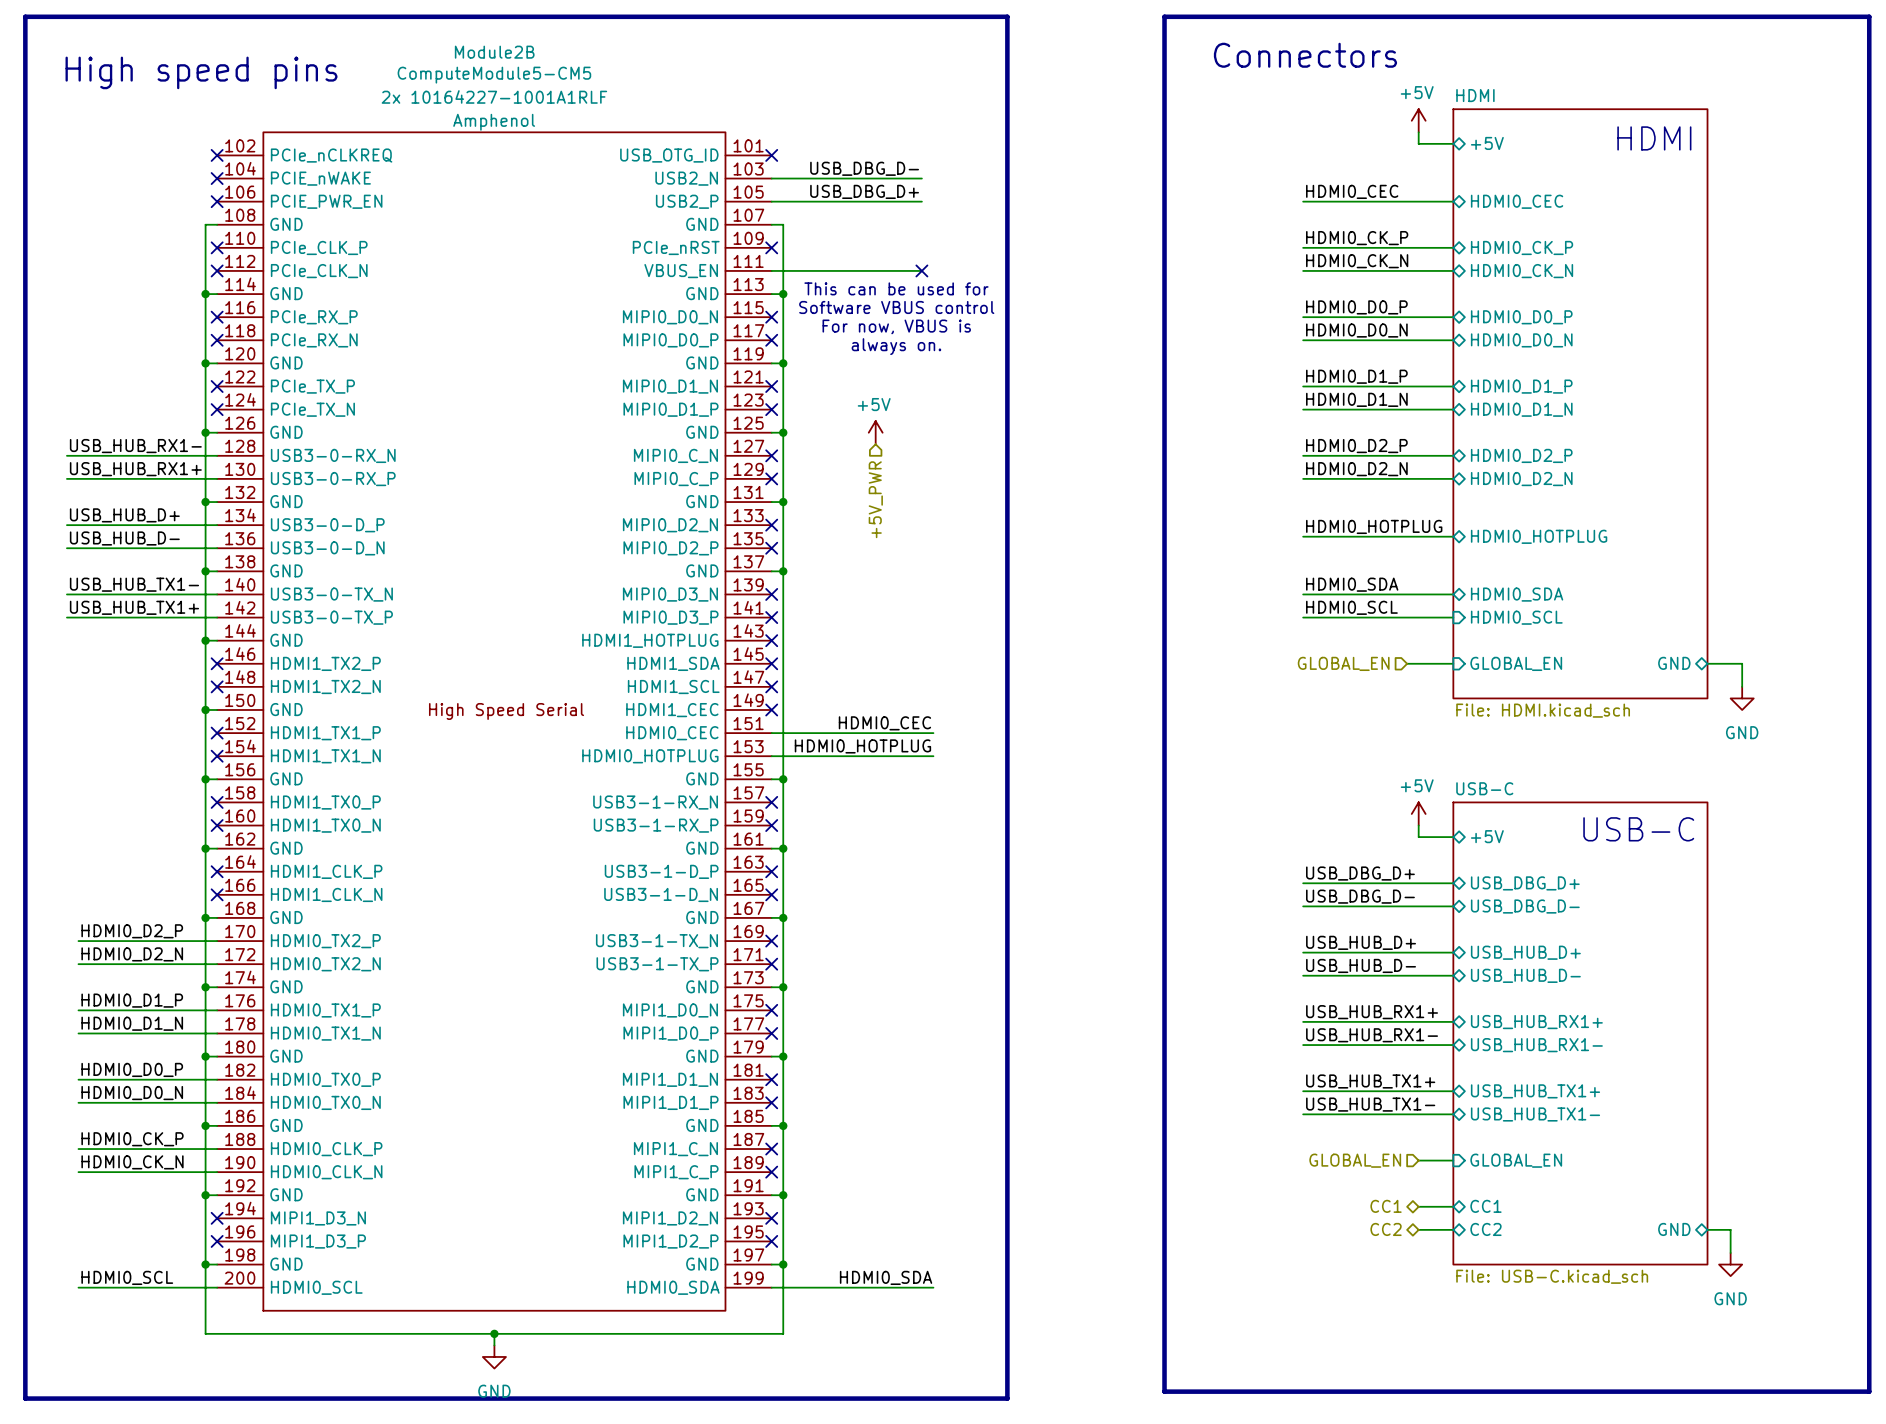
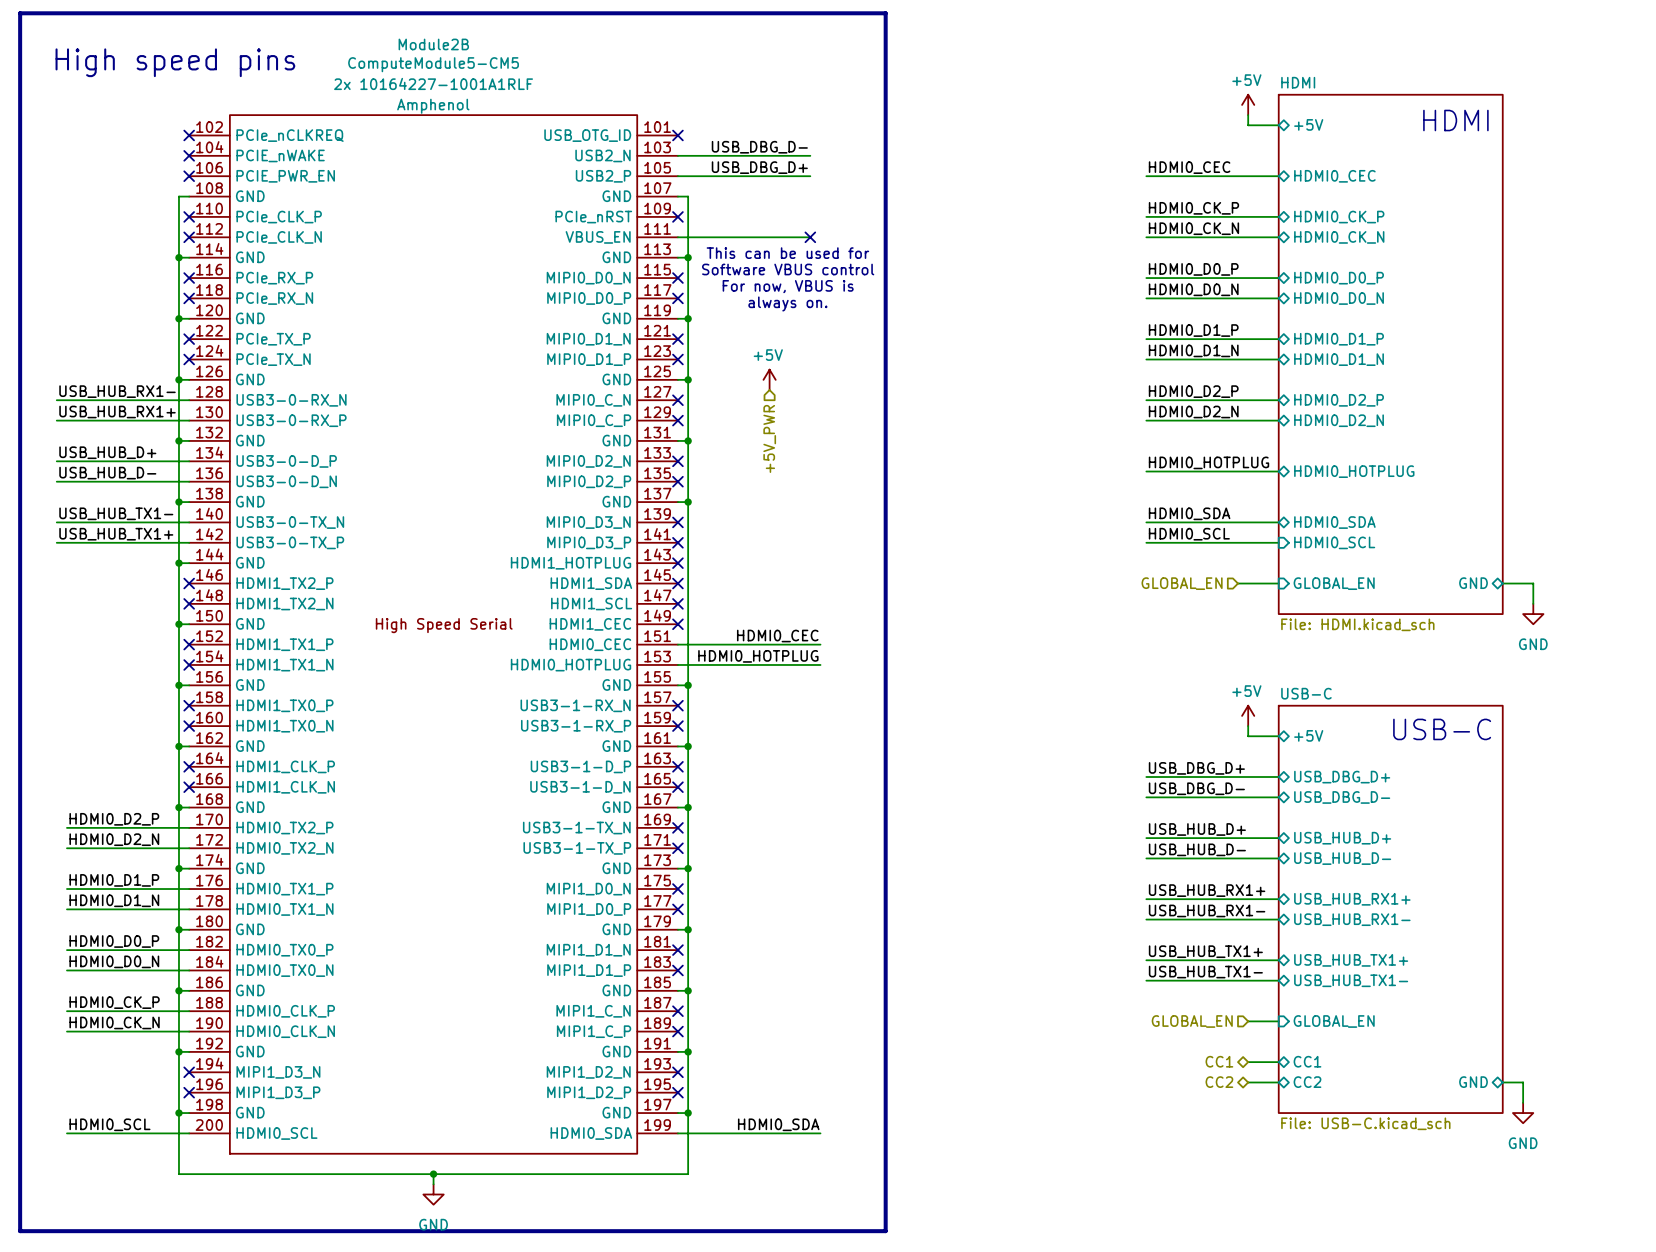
line: (1164, 16) (1869, 16) (1869, 1391) (1164, 1391) (1164, 16) -> none
text: Connectors (1305, 55) -> none

